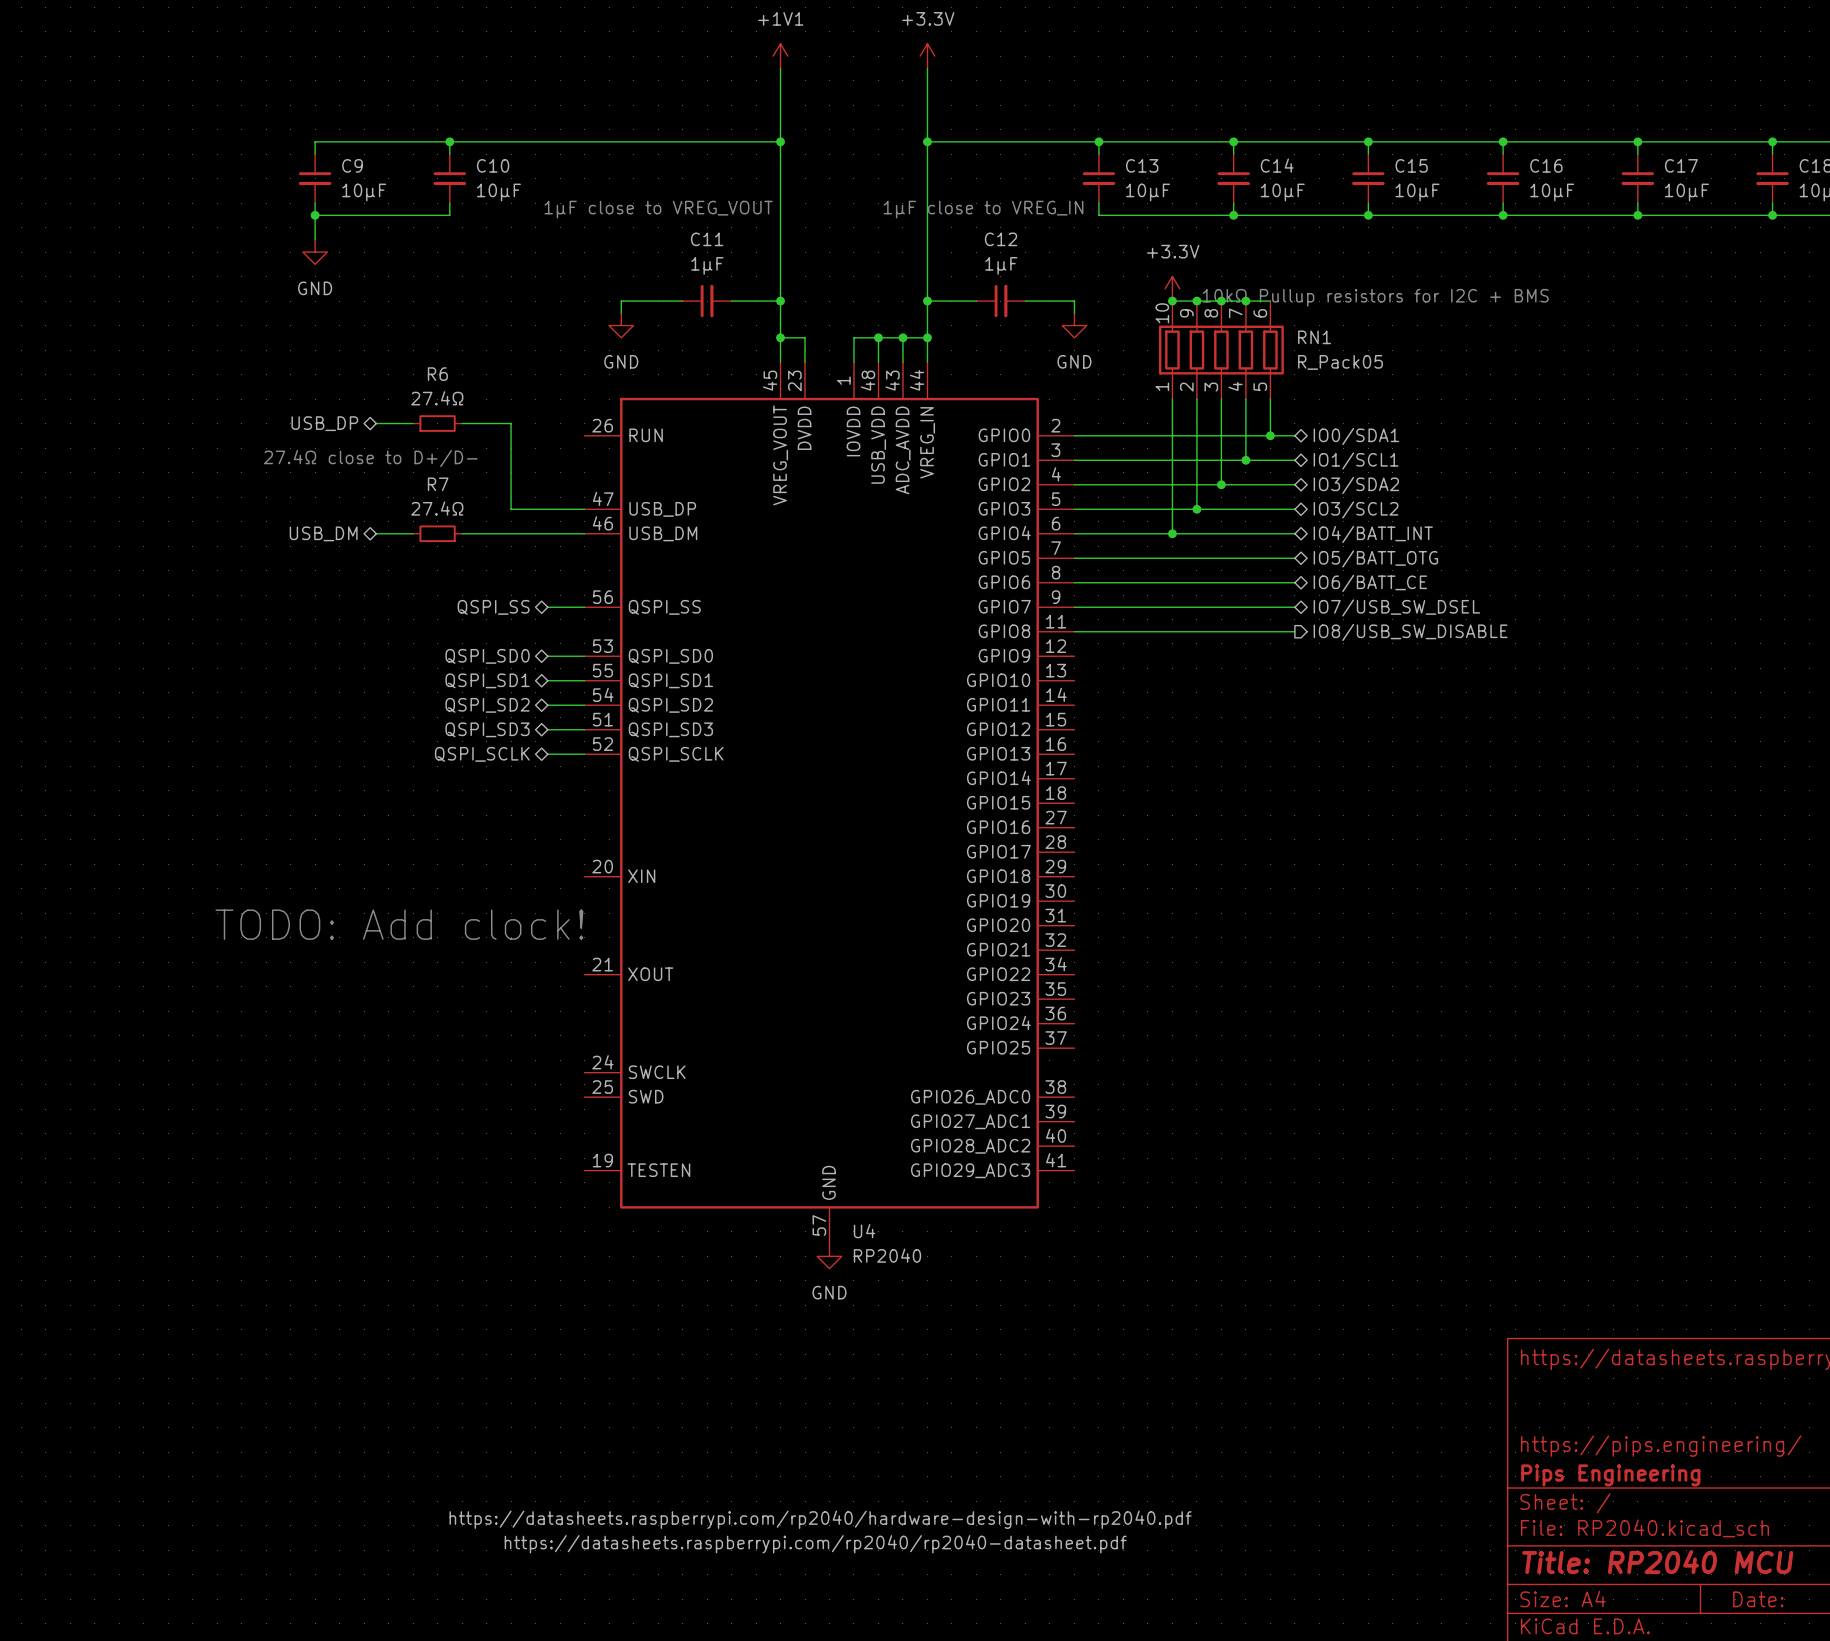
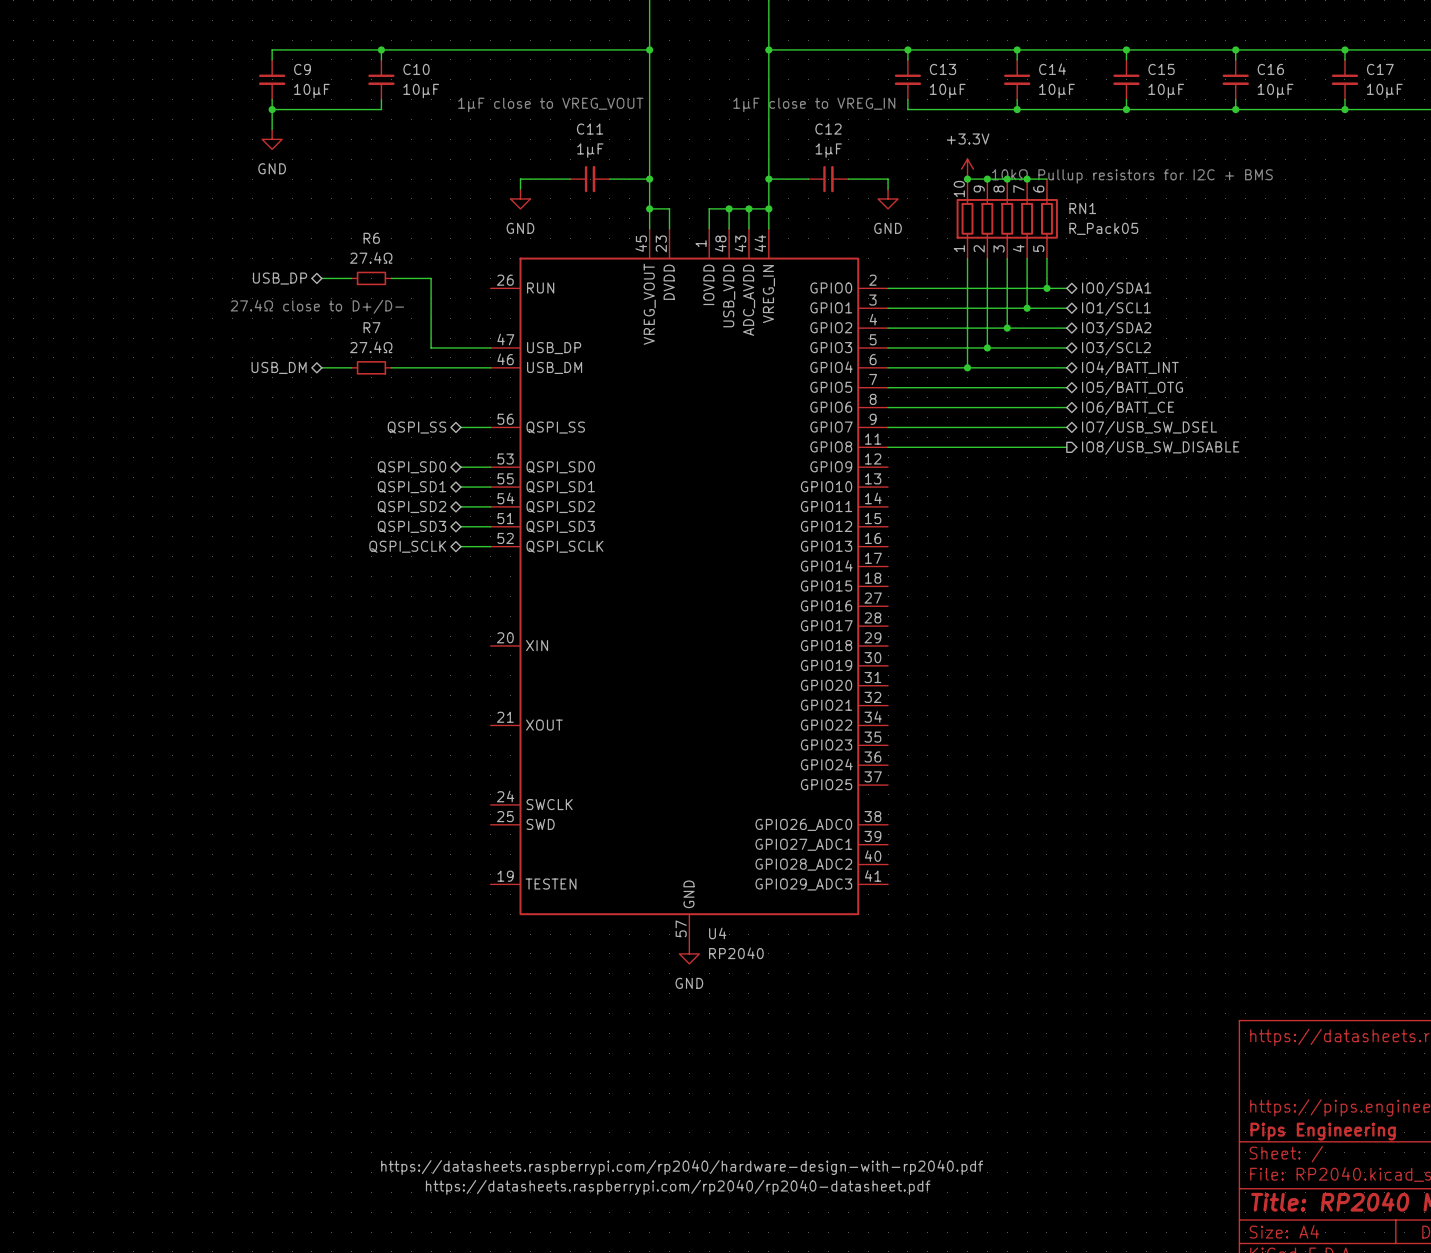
text: TODO: Add clock! (399, 924) -> none

